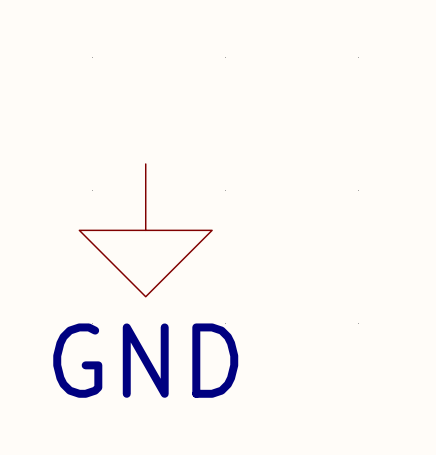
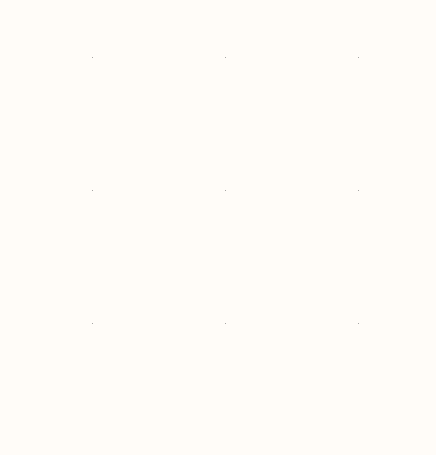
power symbol: GND (145, 230) -> none

